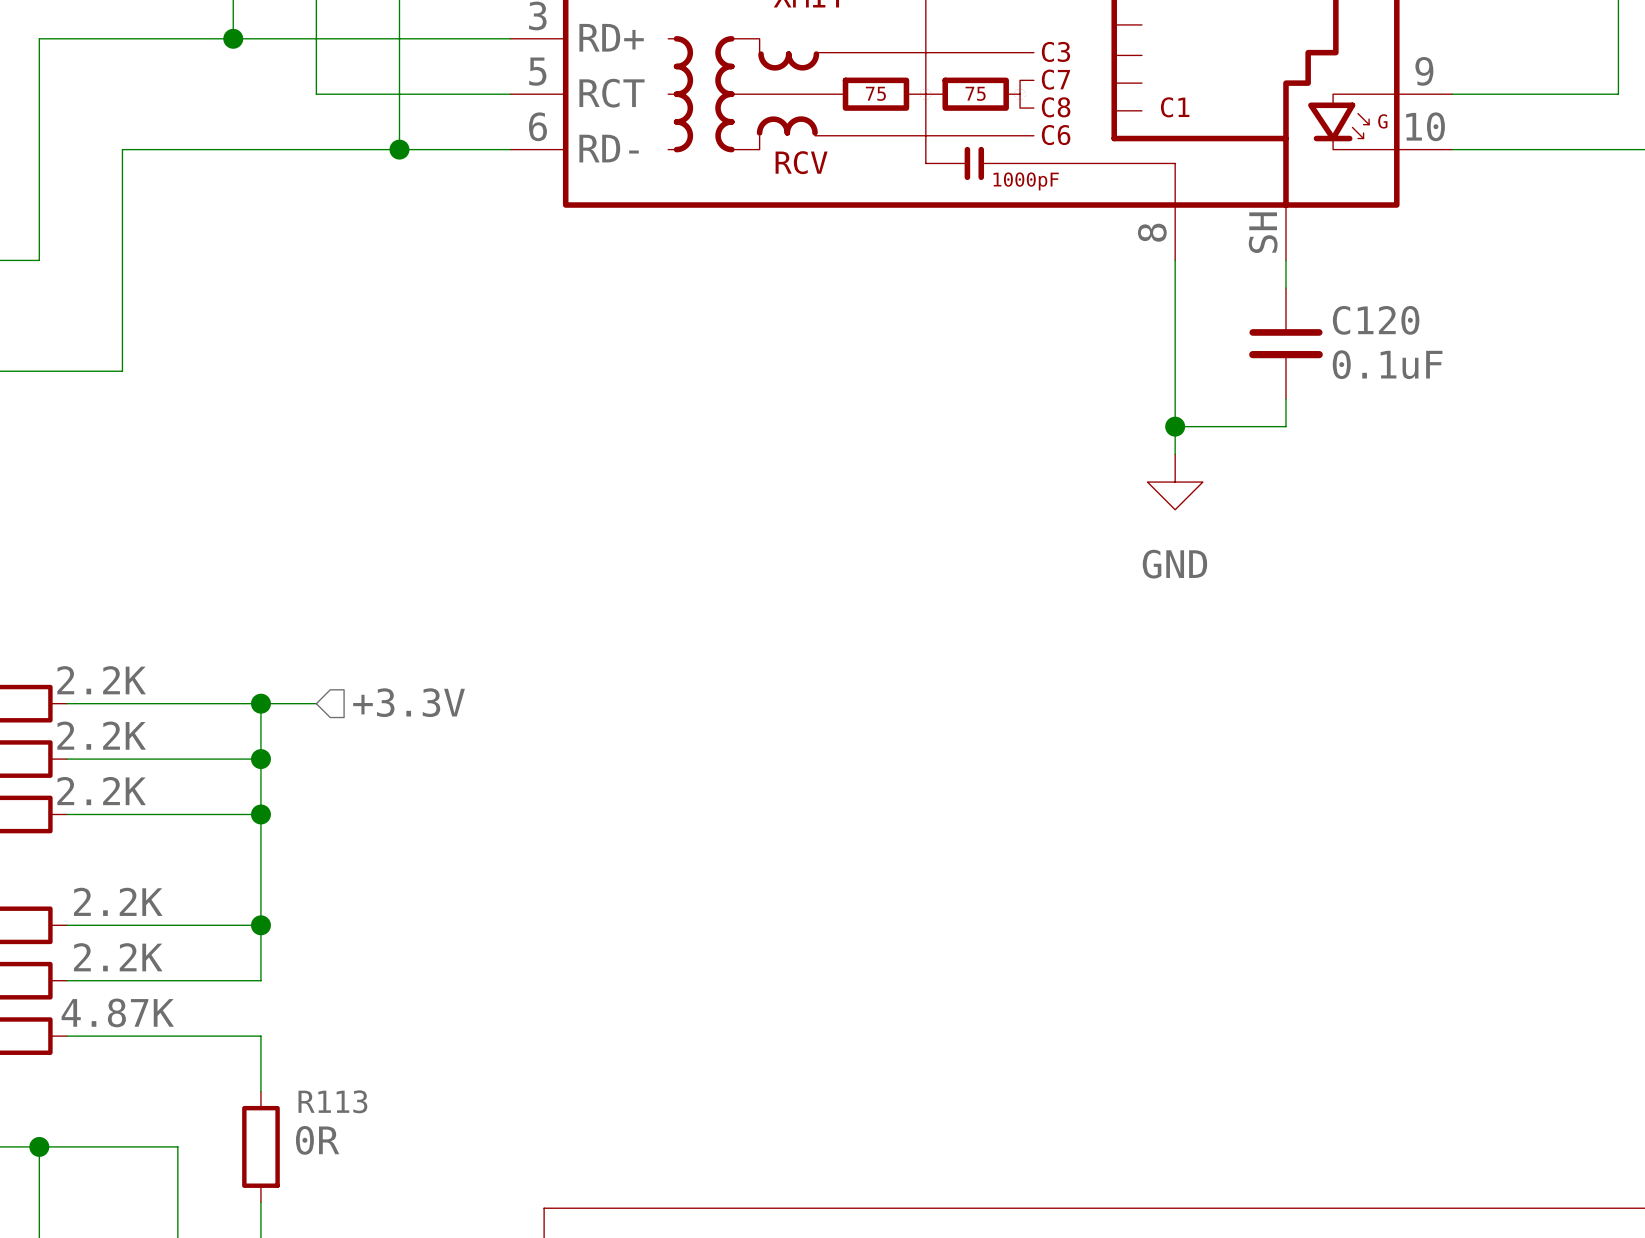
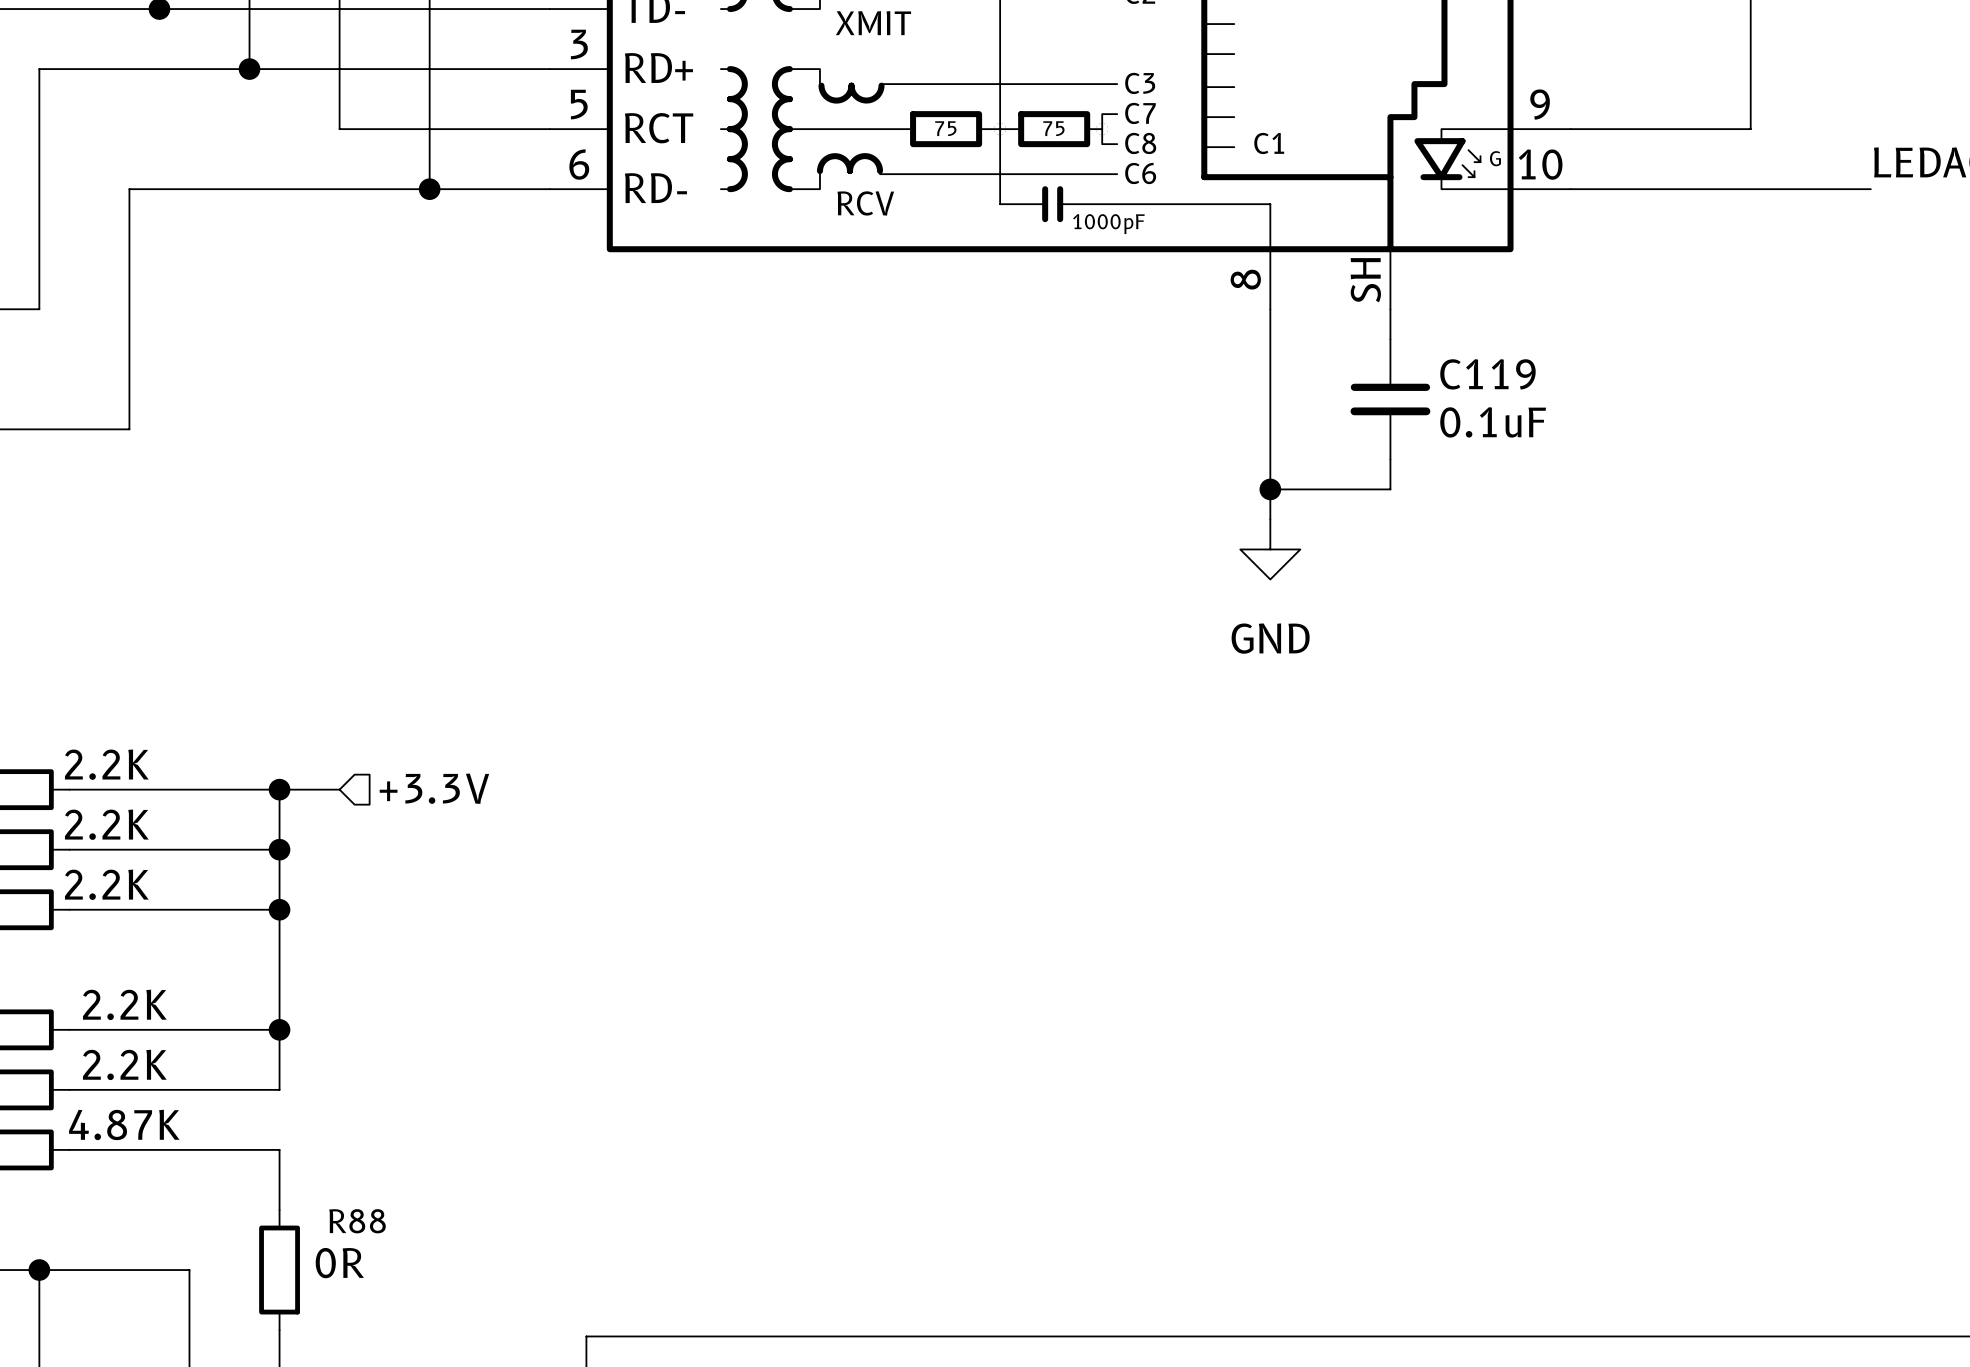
C120 name: C120 (1376, 320) -> C119 (1487, 374)
R113 name: R113 (332, 1101) -> R88 (357, 1221)

